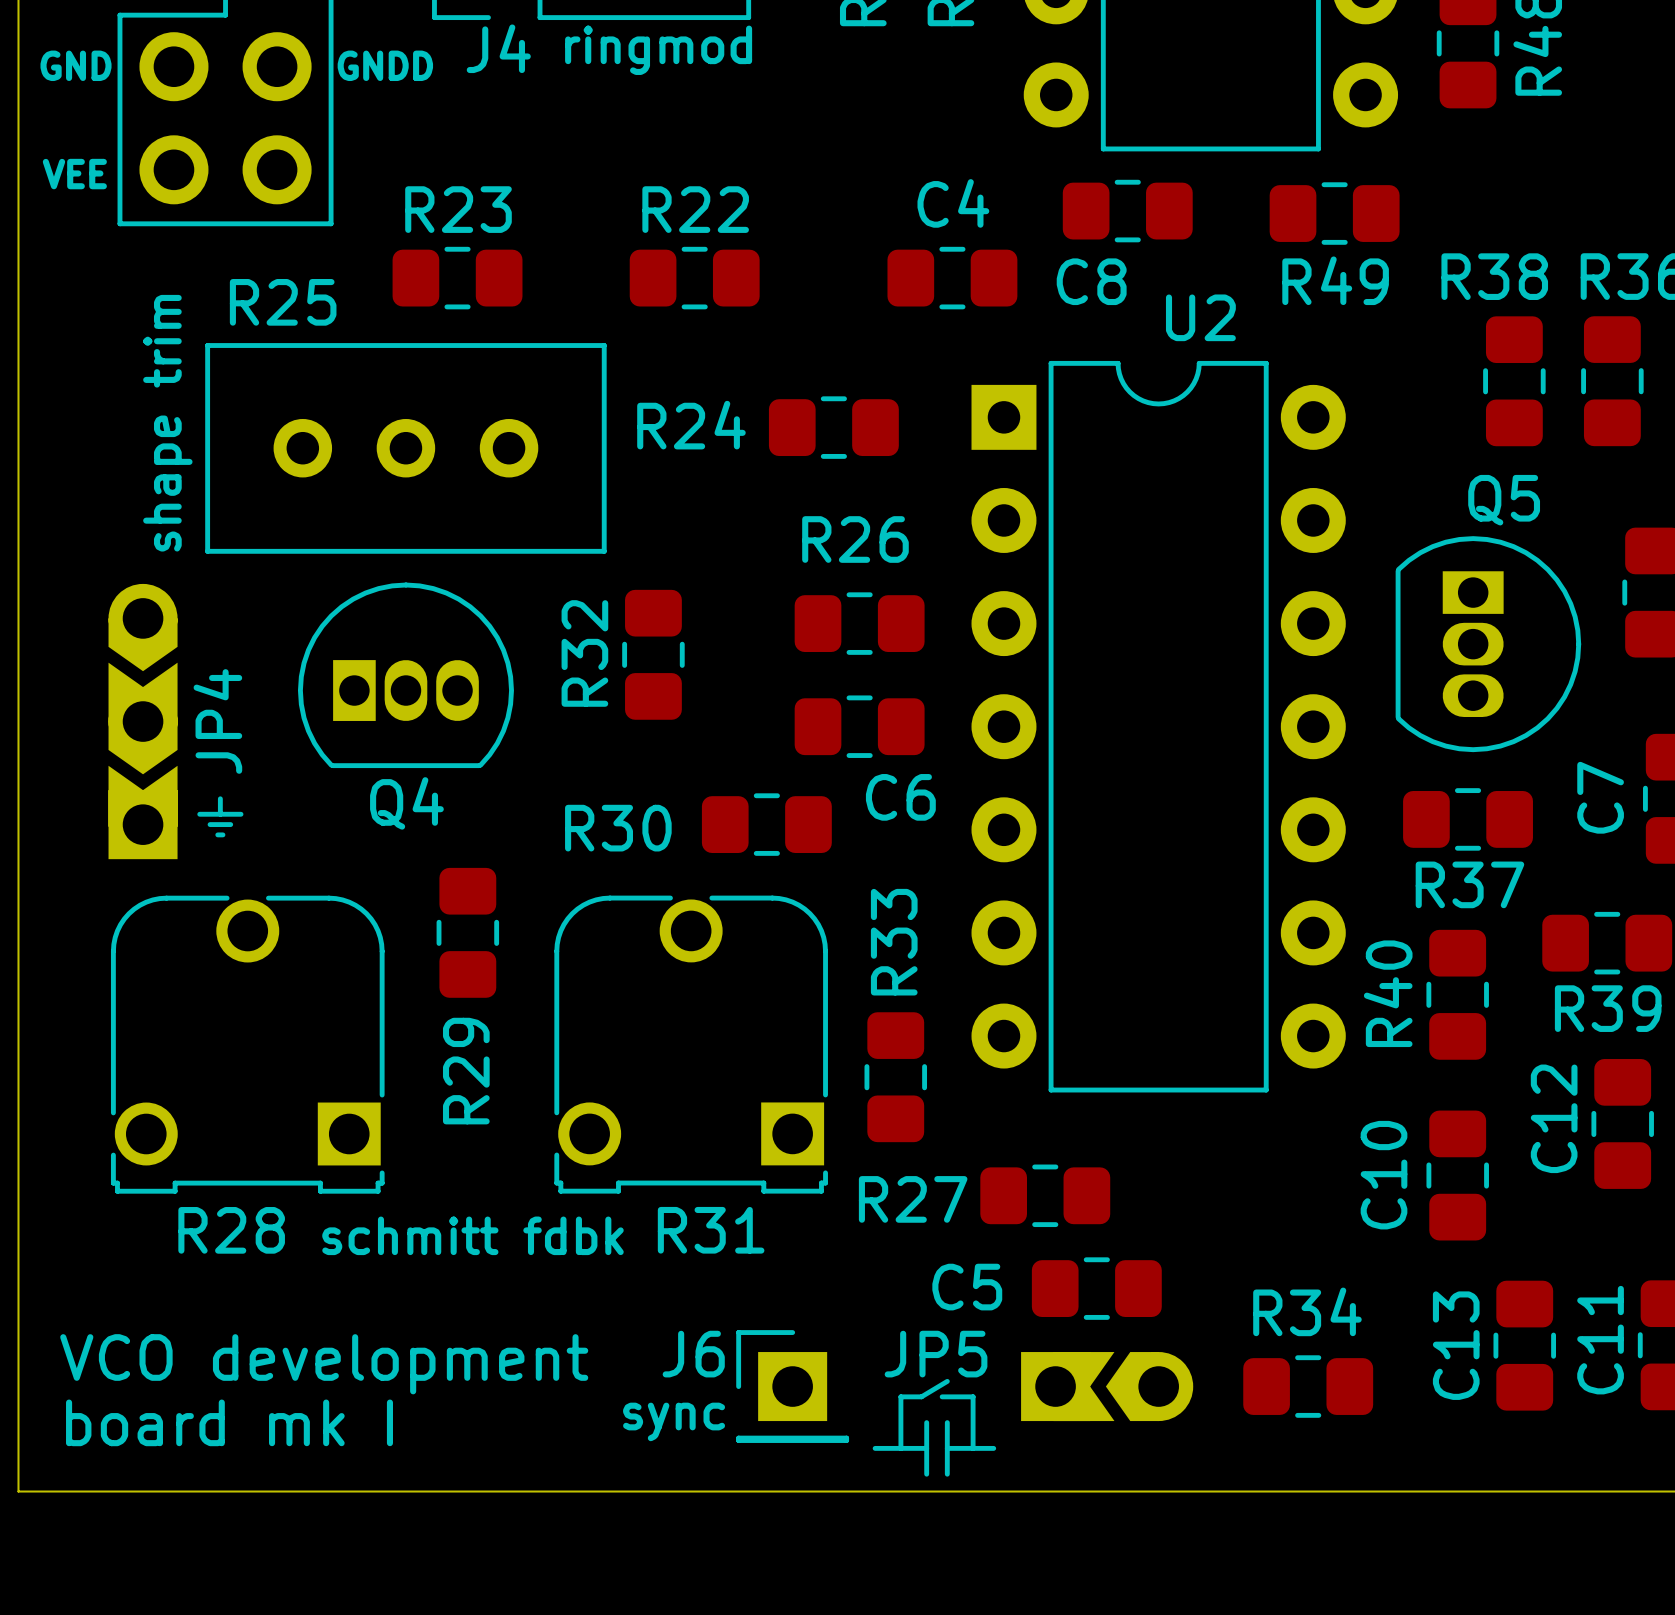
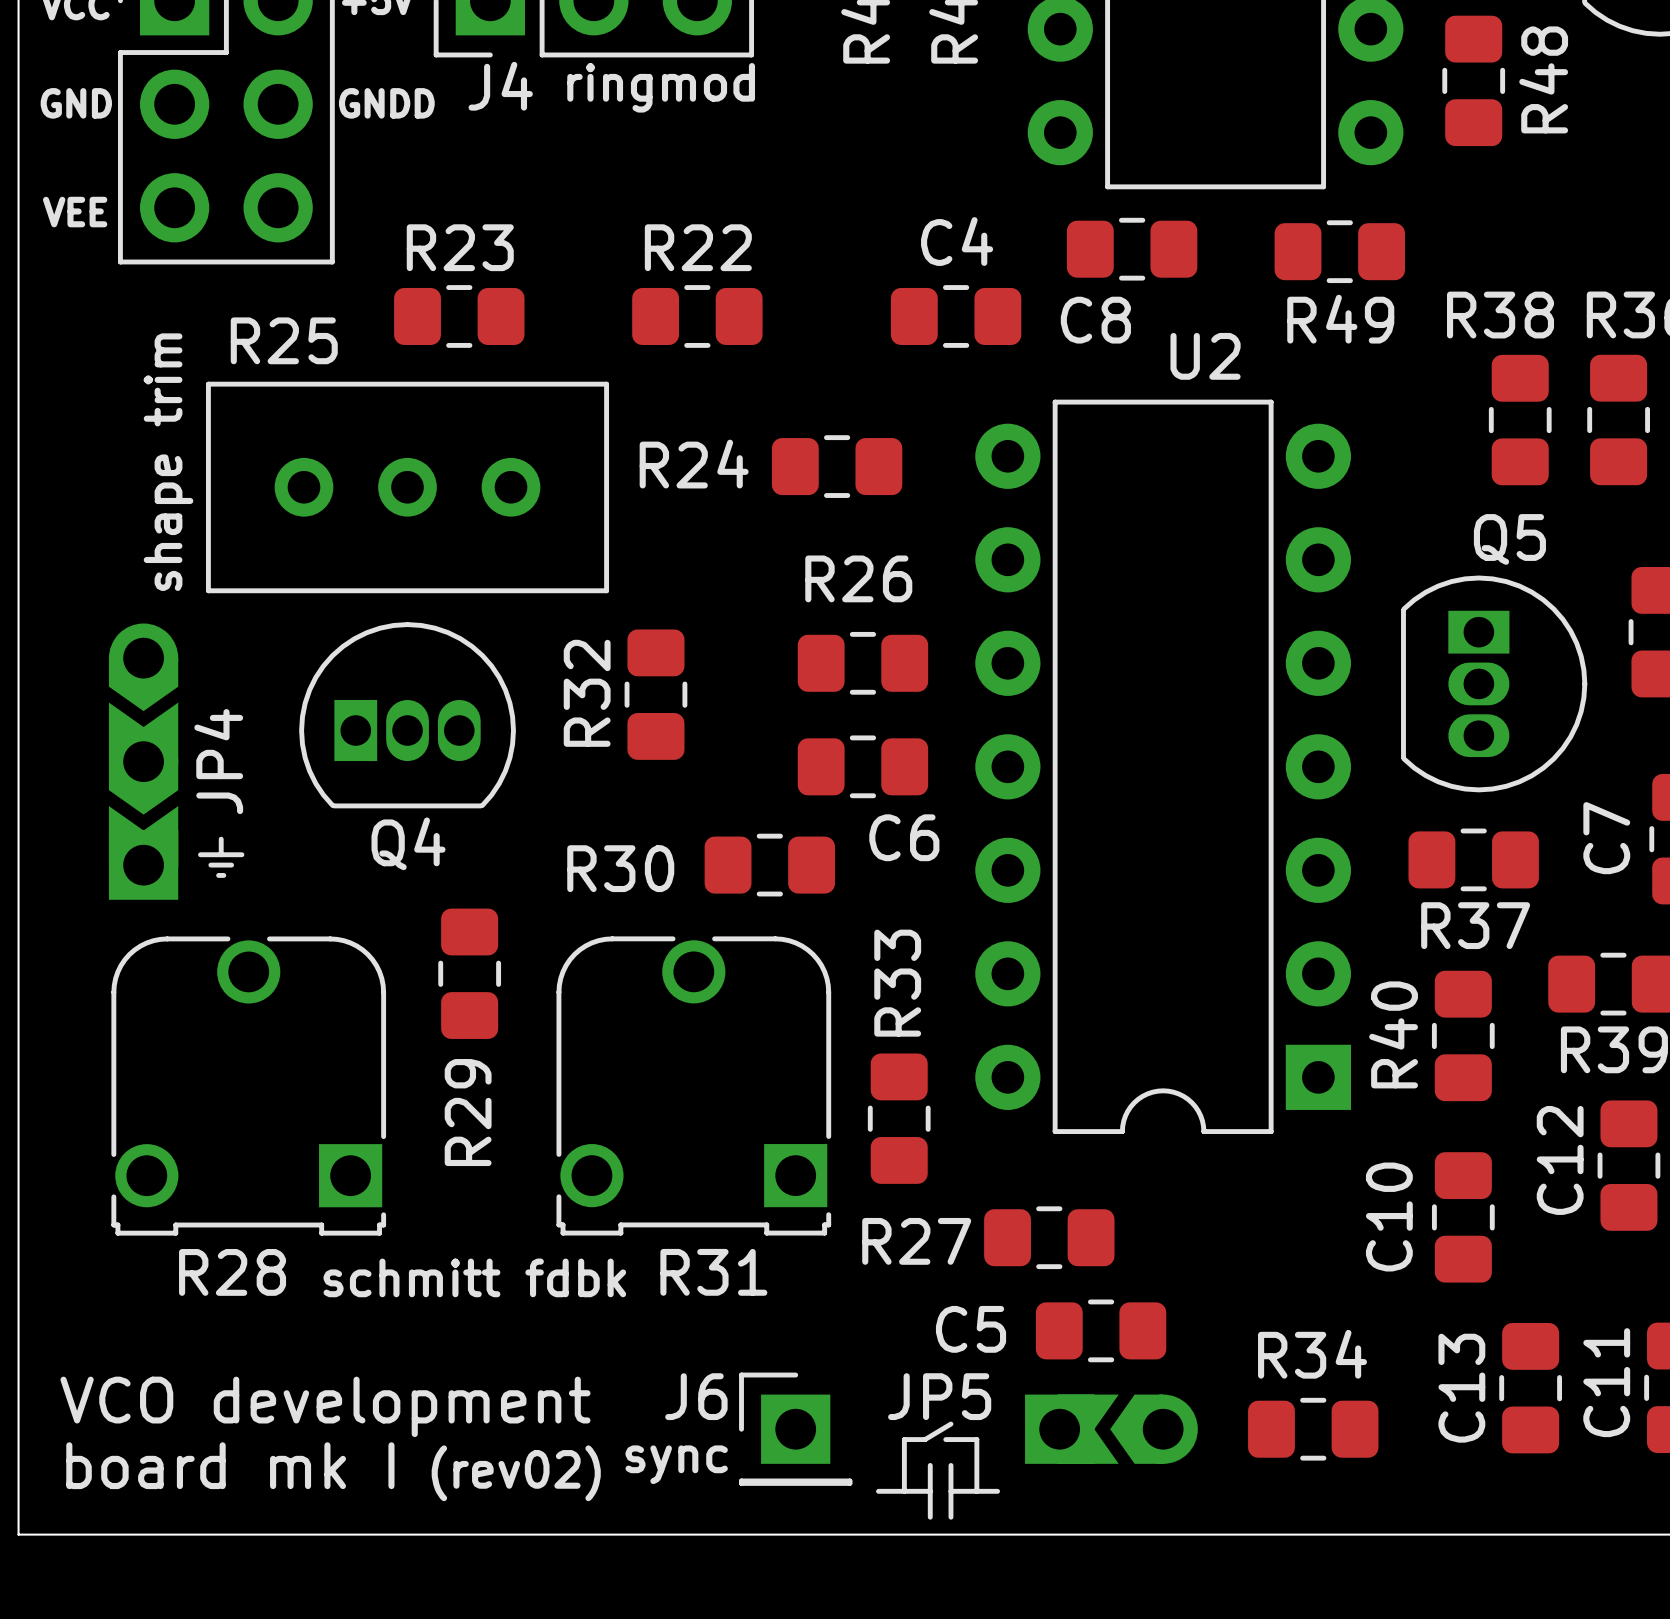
U2 rotation: 0° (1158, 726) -> 180° (1163, 766)
text: none -> (rev02) (516, 1473)

